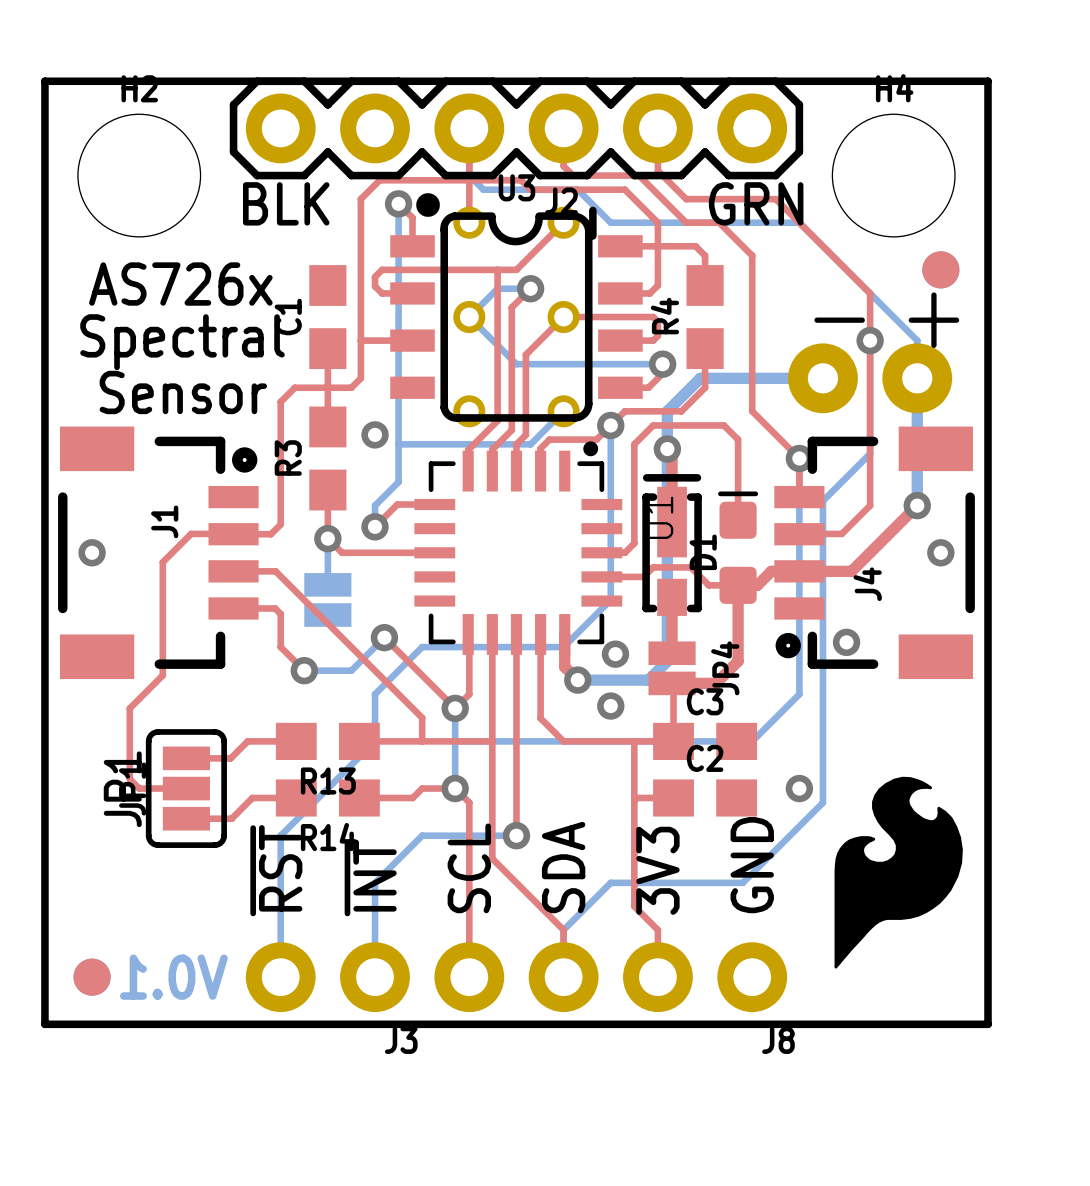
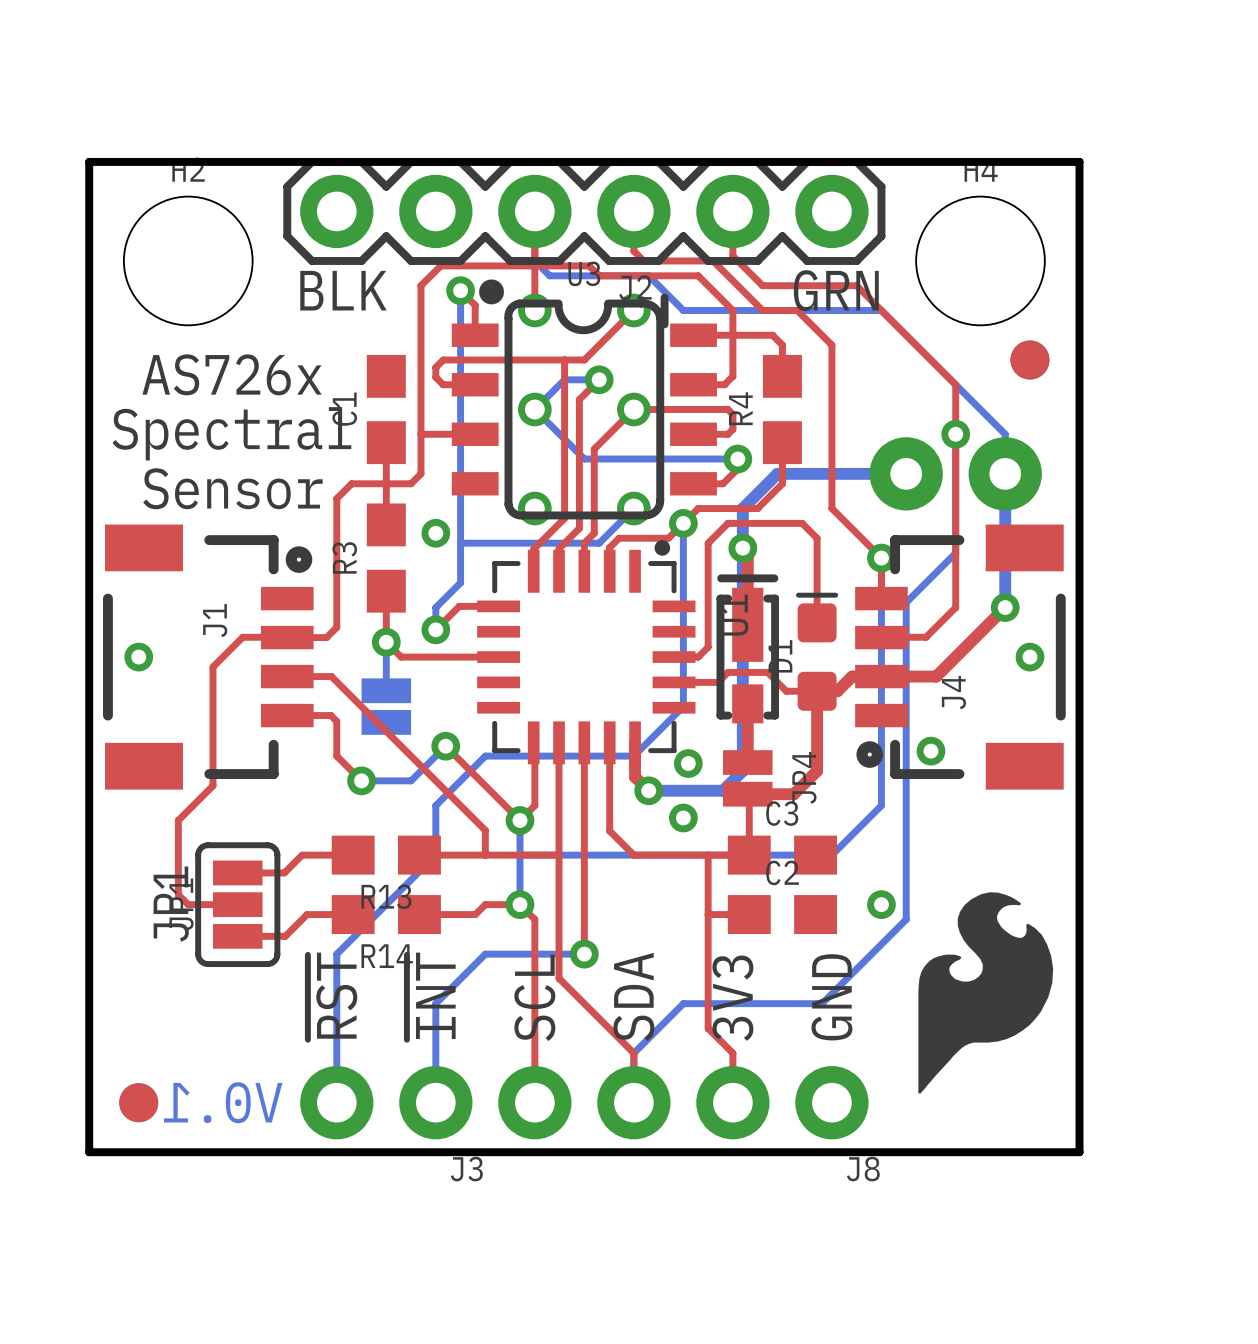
text: - (839, 320) -> none
text: + (933, 320) -> none

